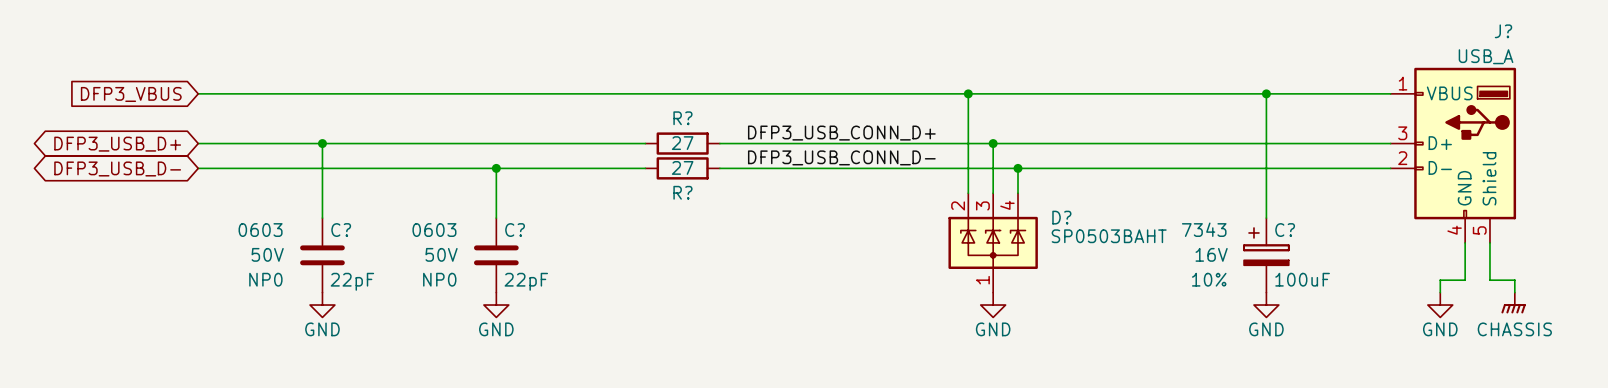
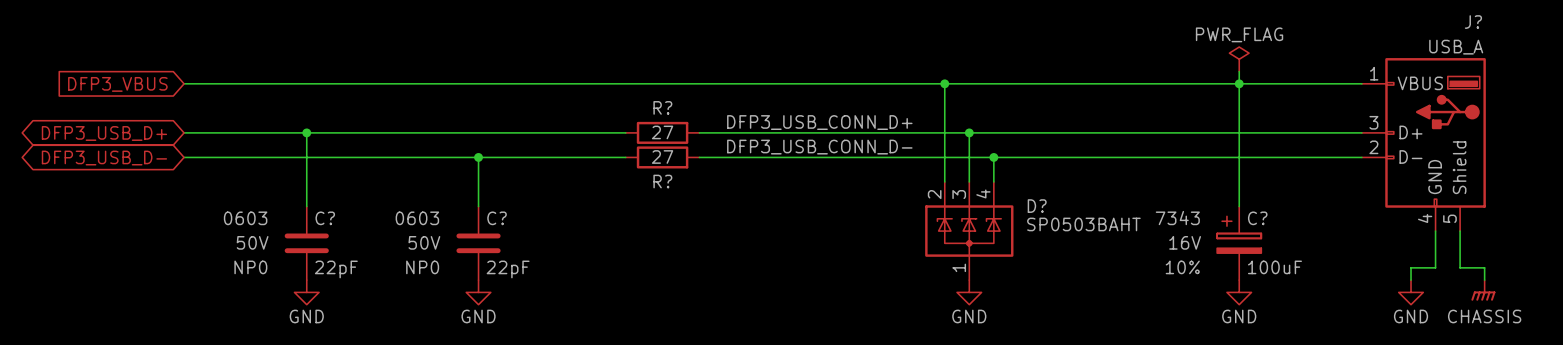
power symbol: none -> PWR_FLAG (1239, 59)
wire: none -> (1239, 71) (1239, 83)

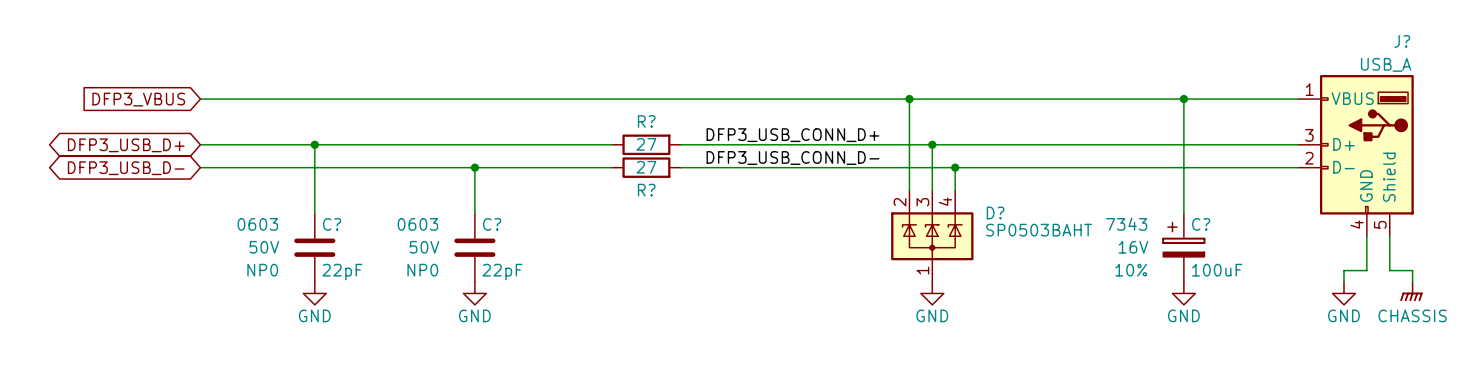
power symbol: PWR_FLAG (1239, 59) -> none
wire: (1239, 71) (1239, 83) -> none

